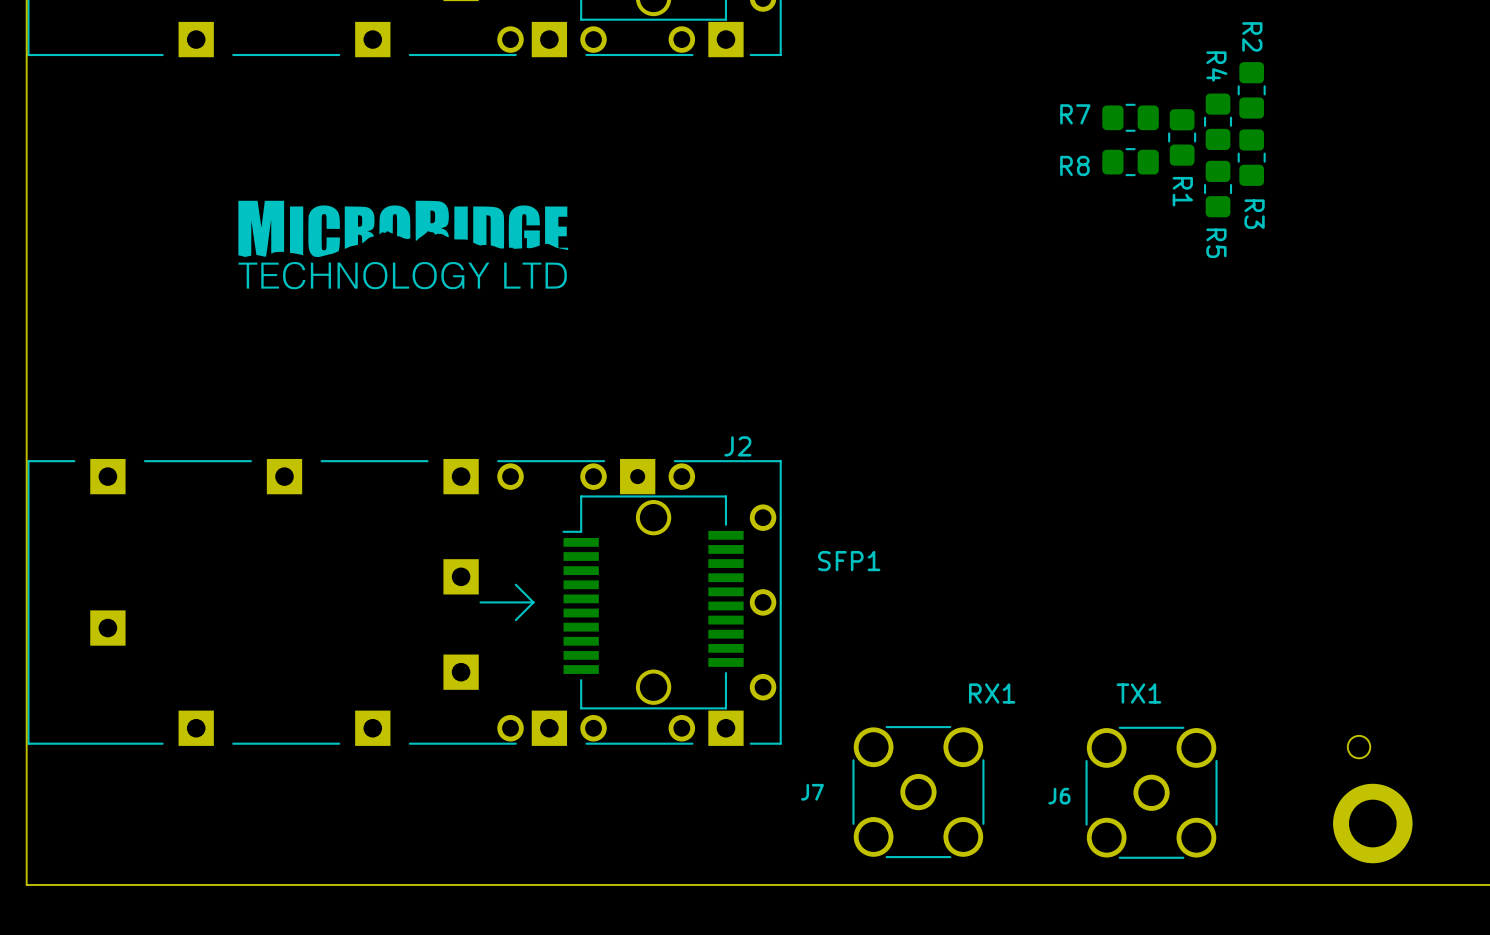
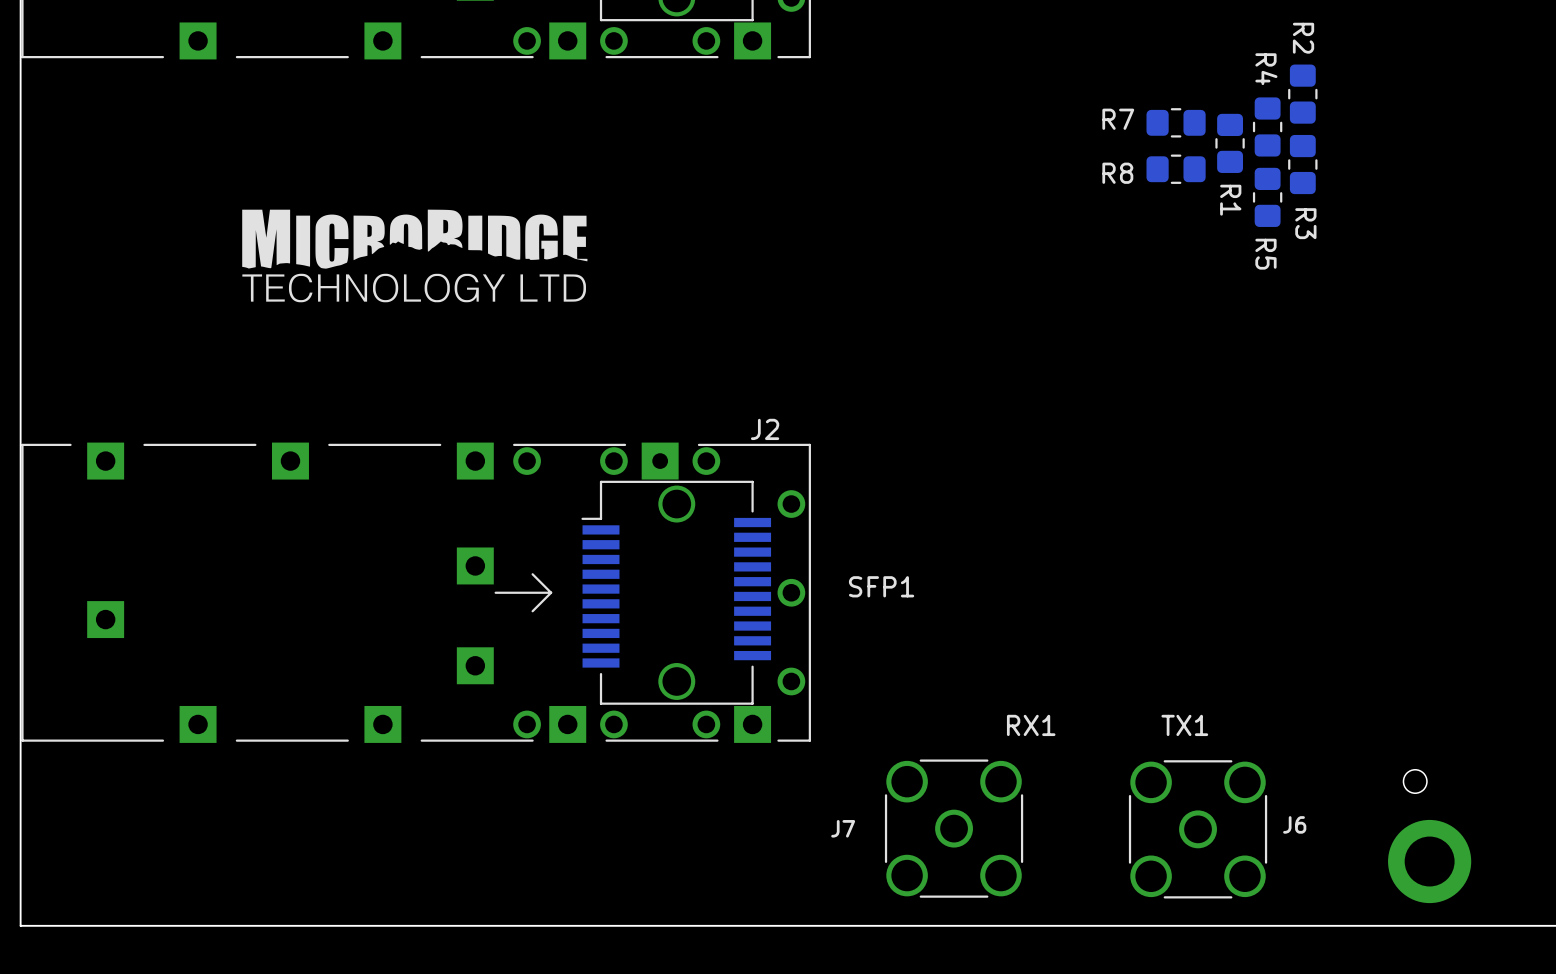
J2 position: (404, 602) -> (416, 592)
J6 name position: J6 (1059, 796) -> J6 (1294, 824)

